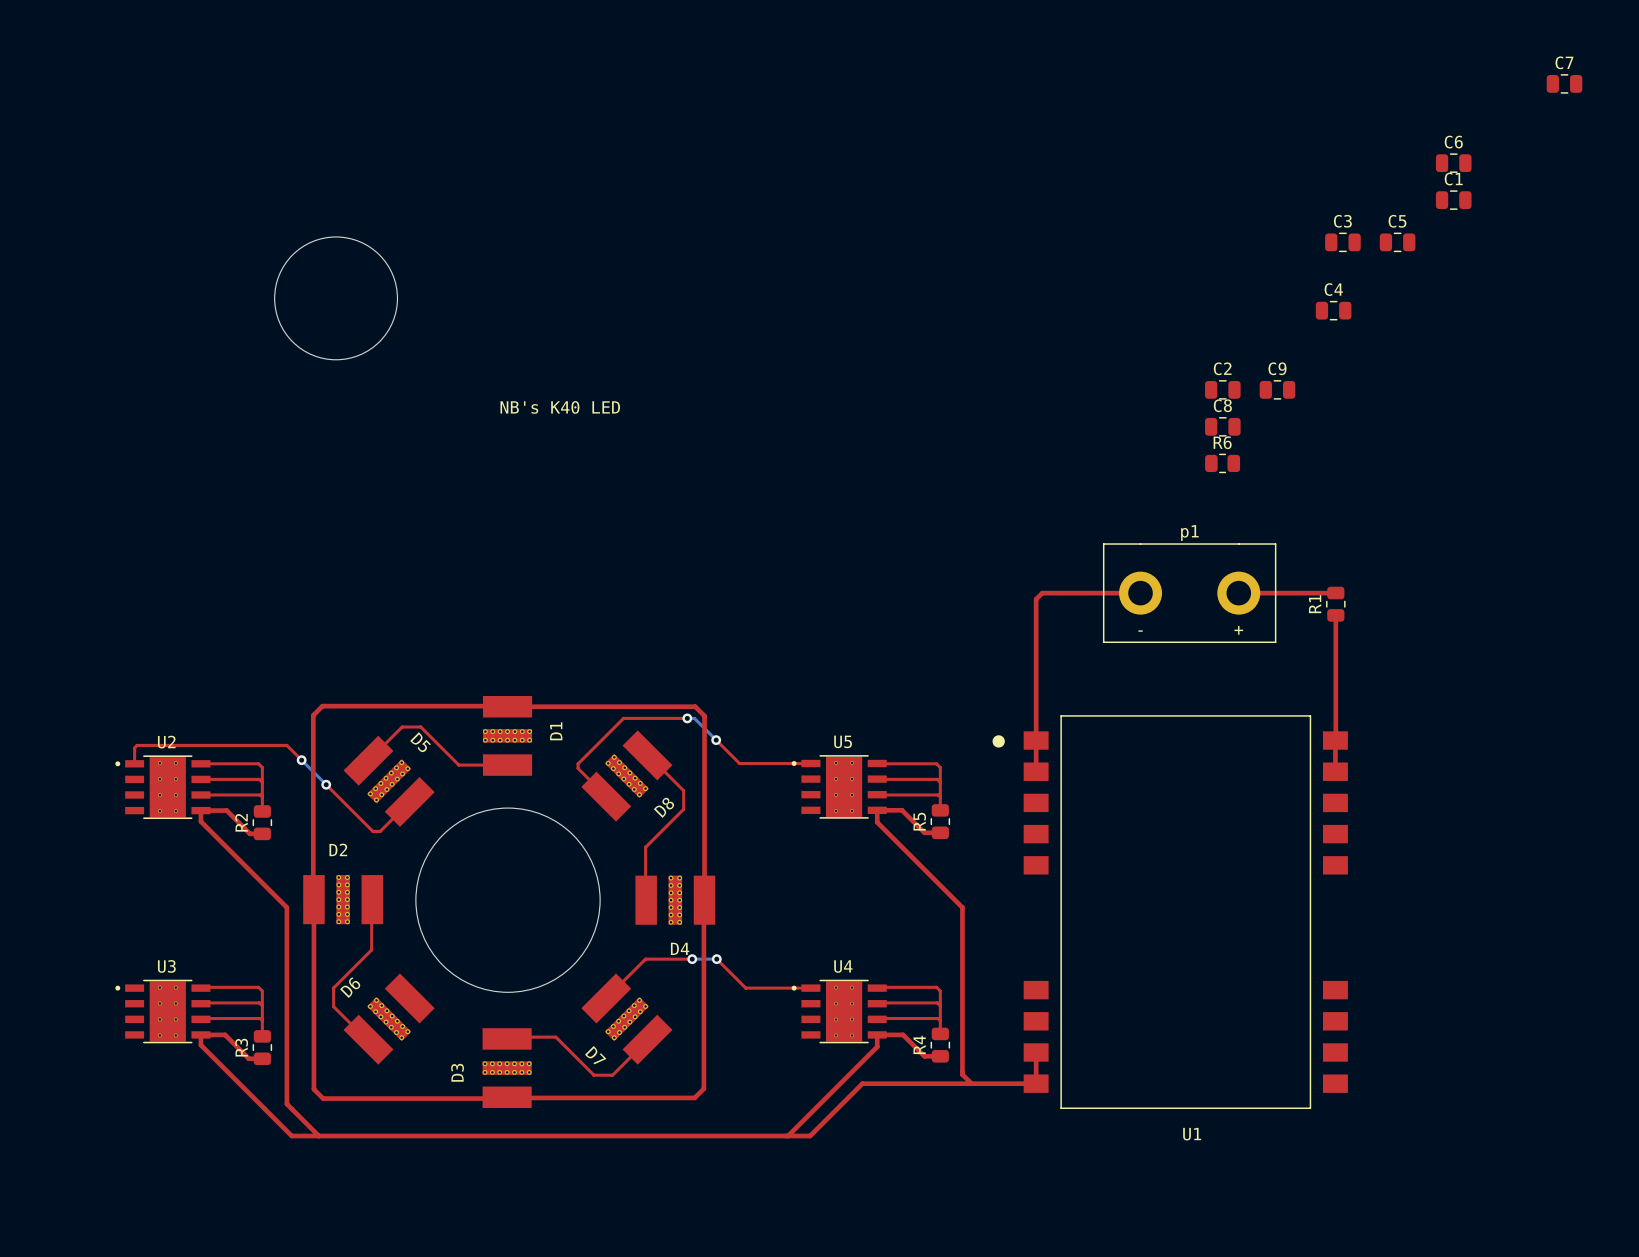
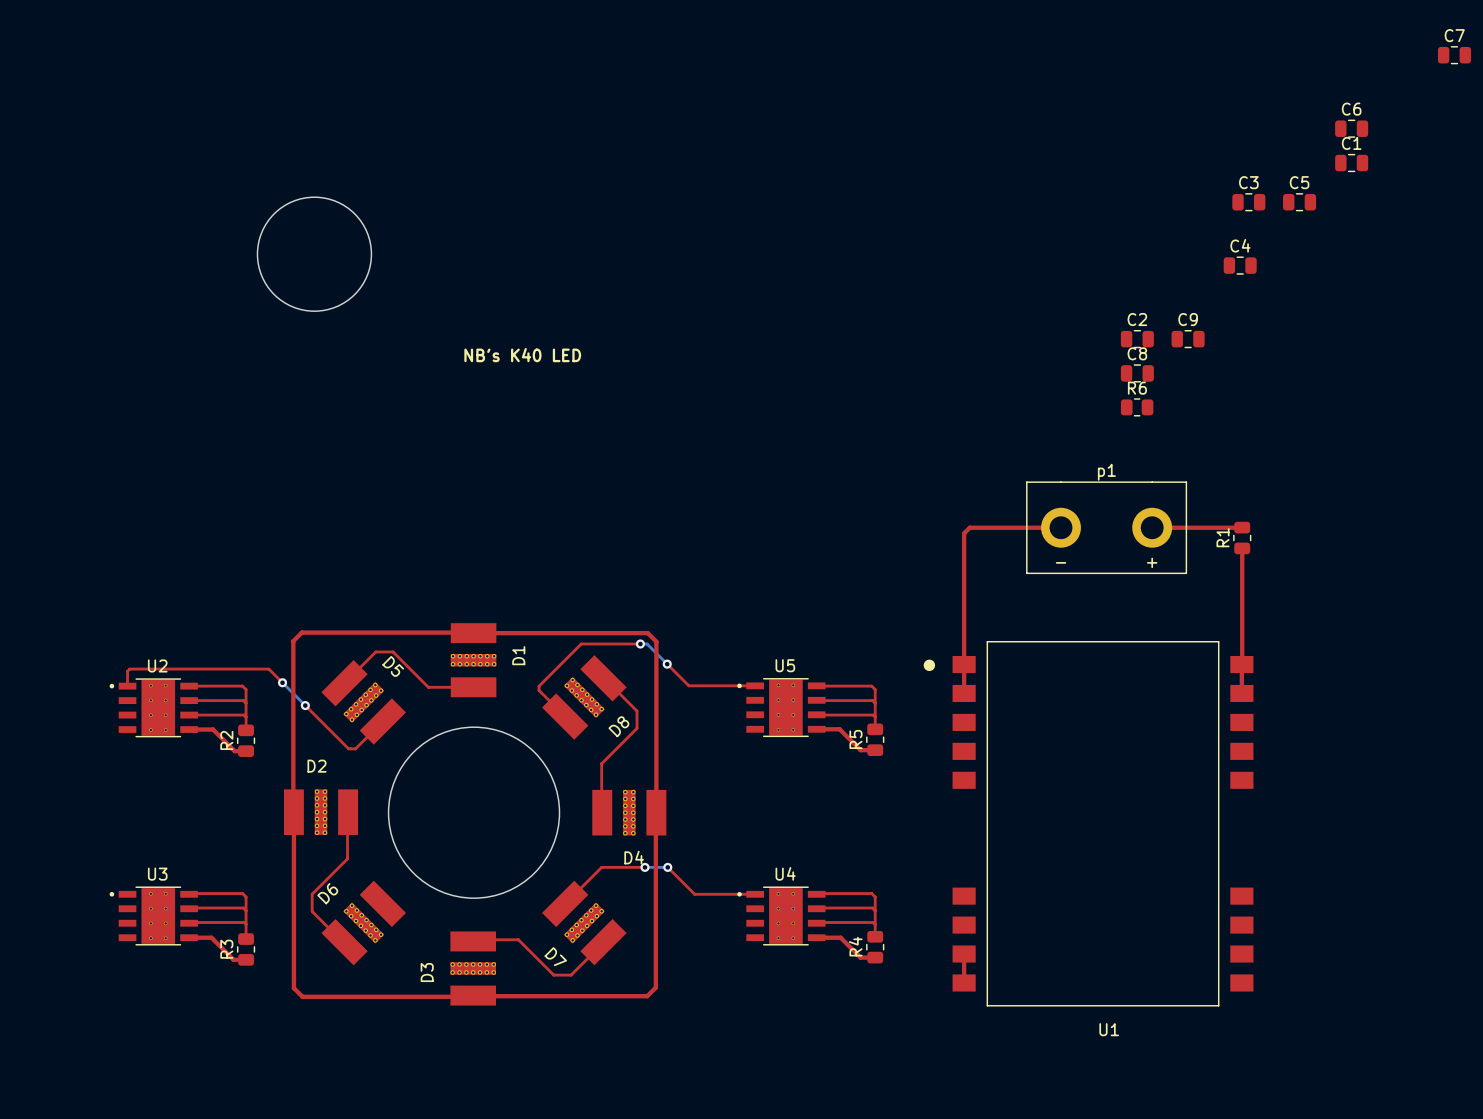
top track: (200, 810) (200, 821) (286, 907) (286, 1104) (318, 1136) -> none
top track: (877, 810) (877, 822) (962, 907) (962, 1074) (971, 1083) -> none
top track: (200, 1034) (200, 1045) (291, 1136) (810, 1136) (862, 1083) (1036, 1083) -> none
top track: (877, 1034) (877, 1046) (788, 1136) -> none

